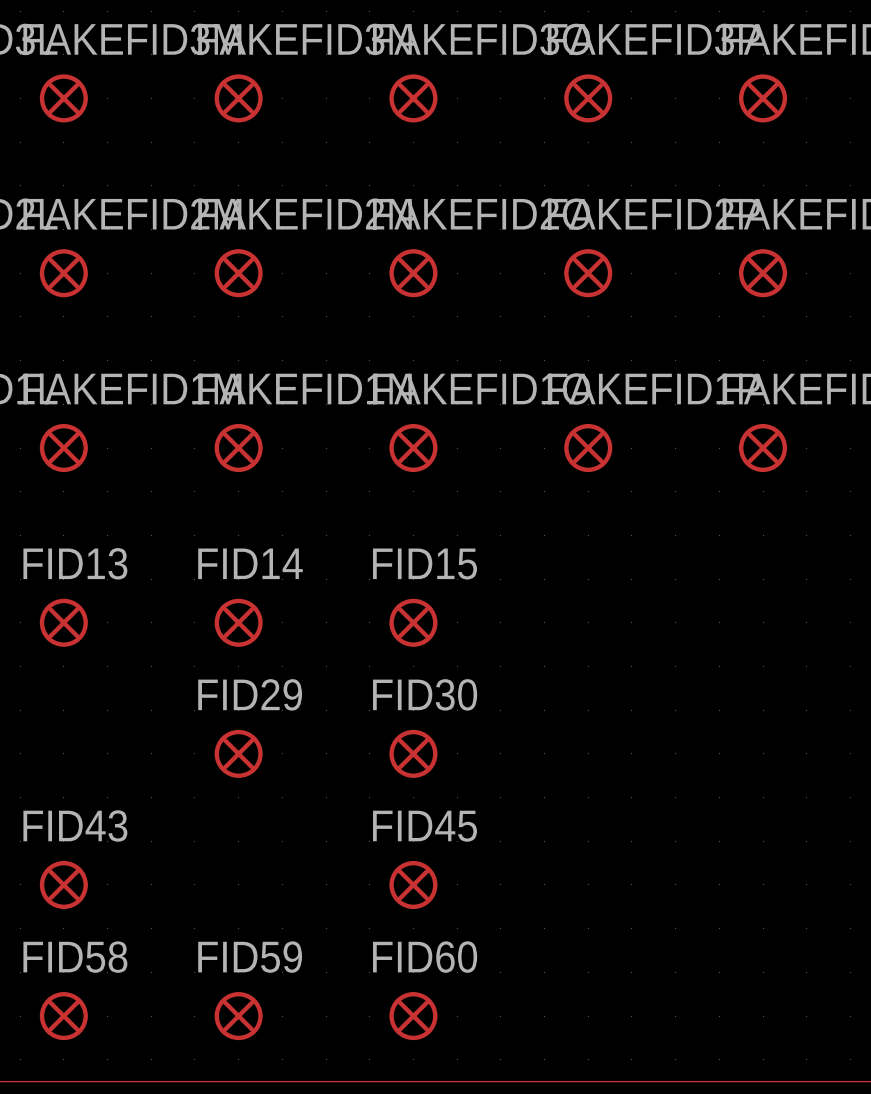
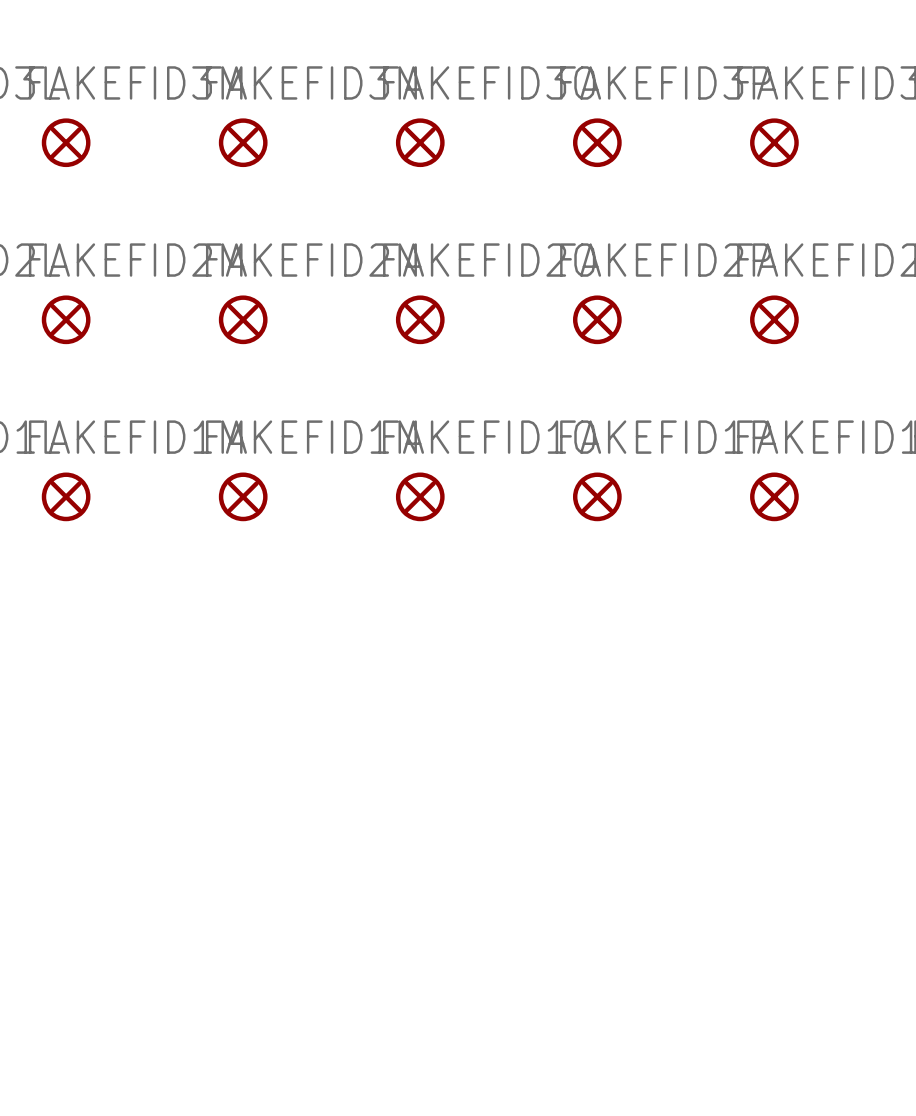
FID13: (63, 622) -> none
FID14: (238, 622) -> none
FID15: (413, 622) -> none
FID29: (238, 753) -> none
FID30: (413, 753) -> none
FID43: (63, 884) -> none
FID45: (413, 884) -> none
FID58: (63, 1016) -> none
FID59: (238, 1016) -> none
FID60: (413, 1016) -> none

